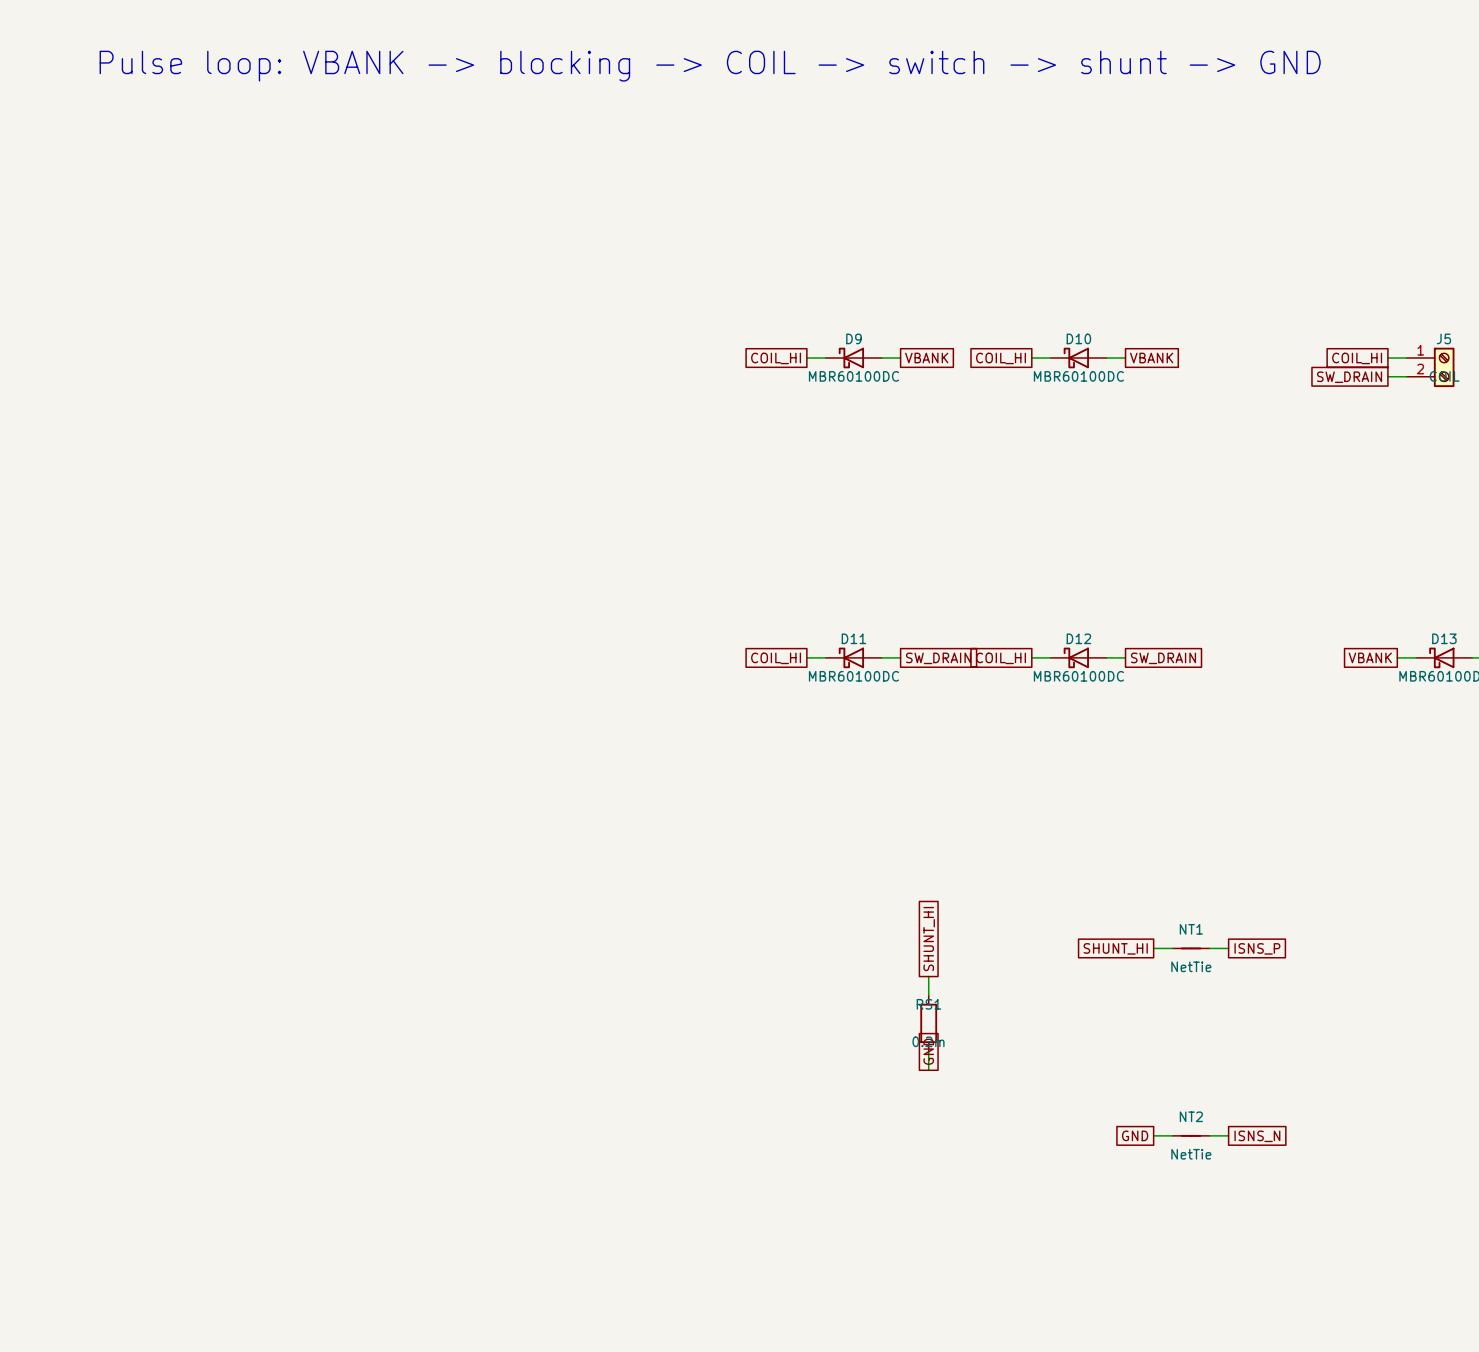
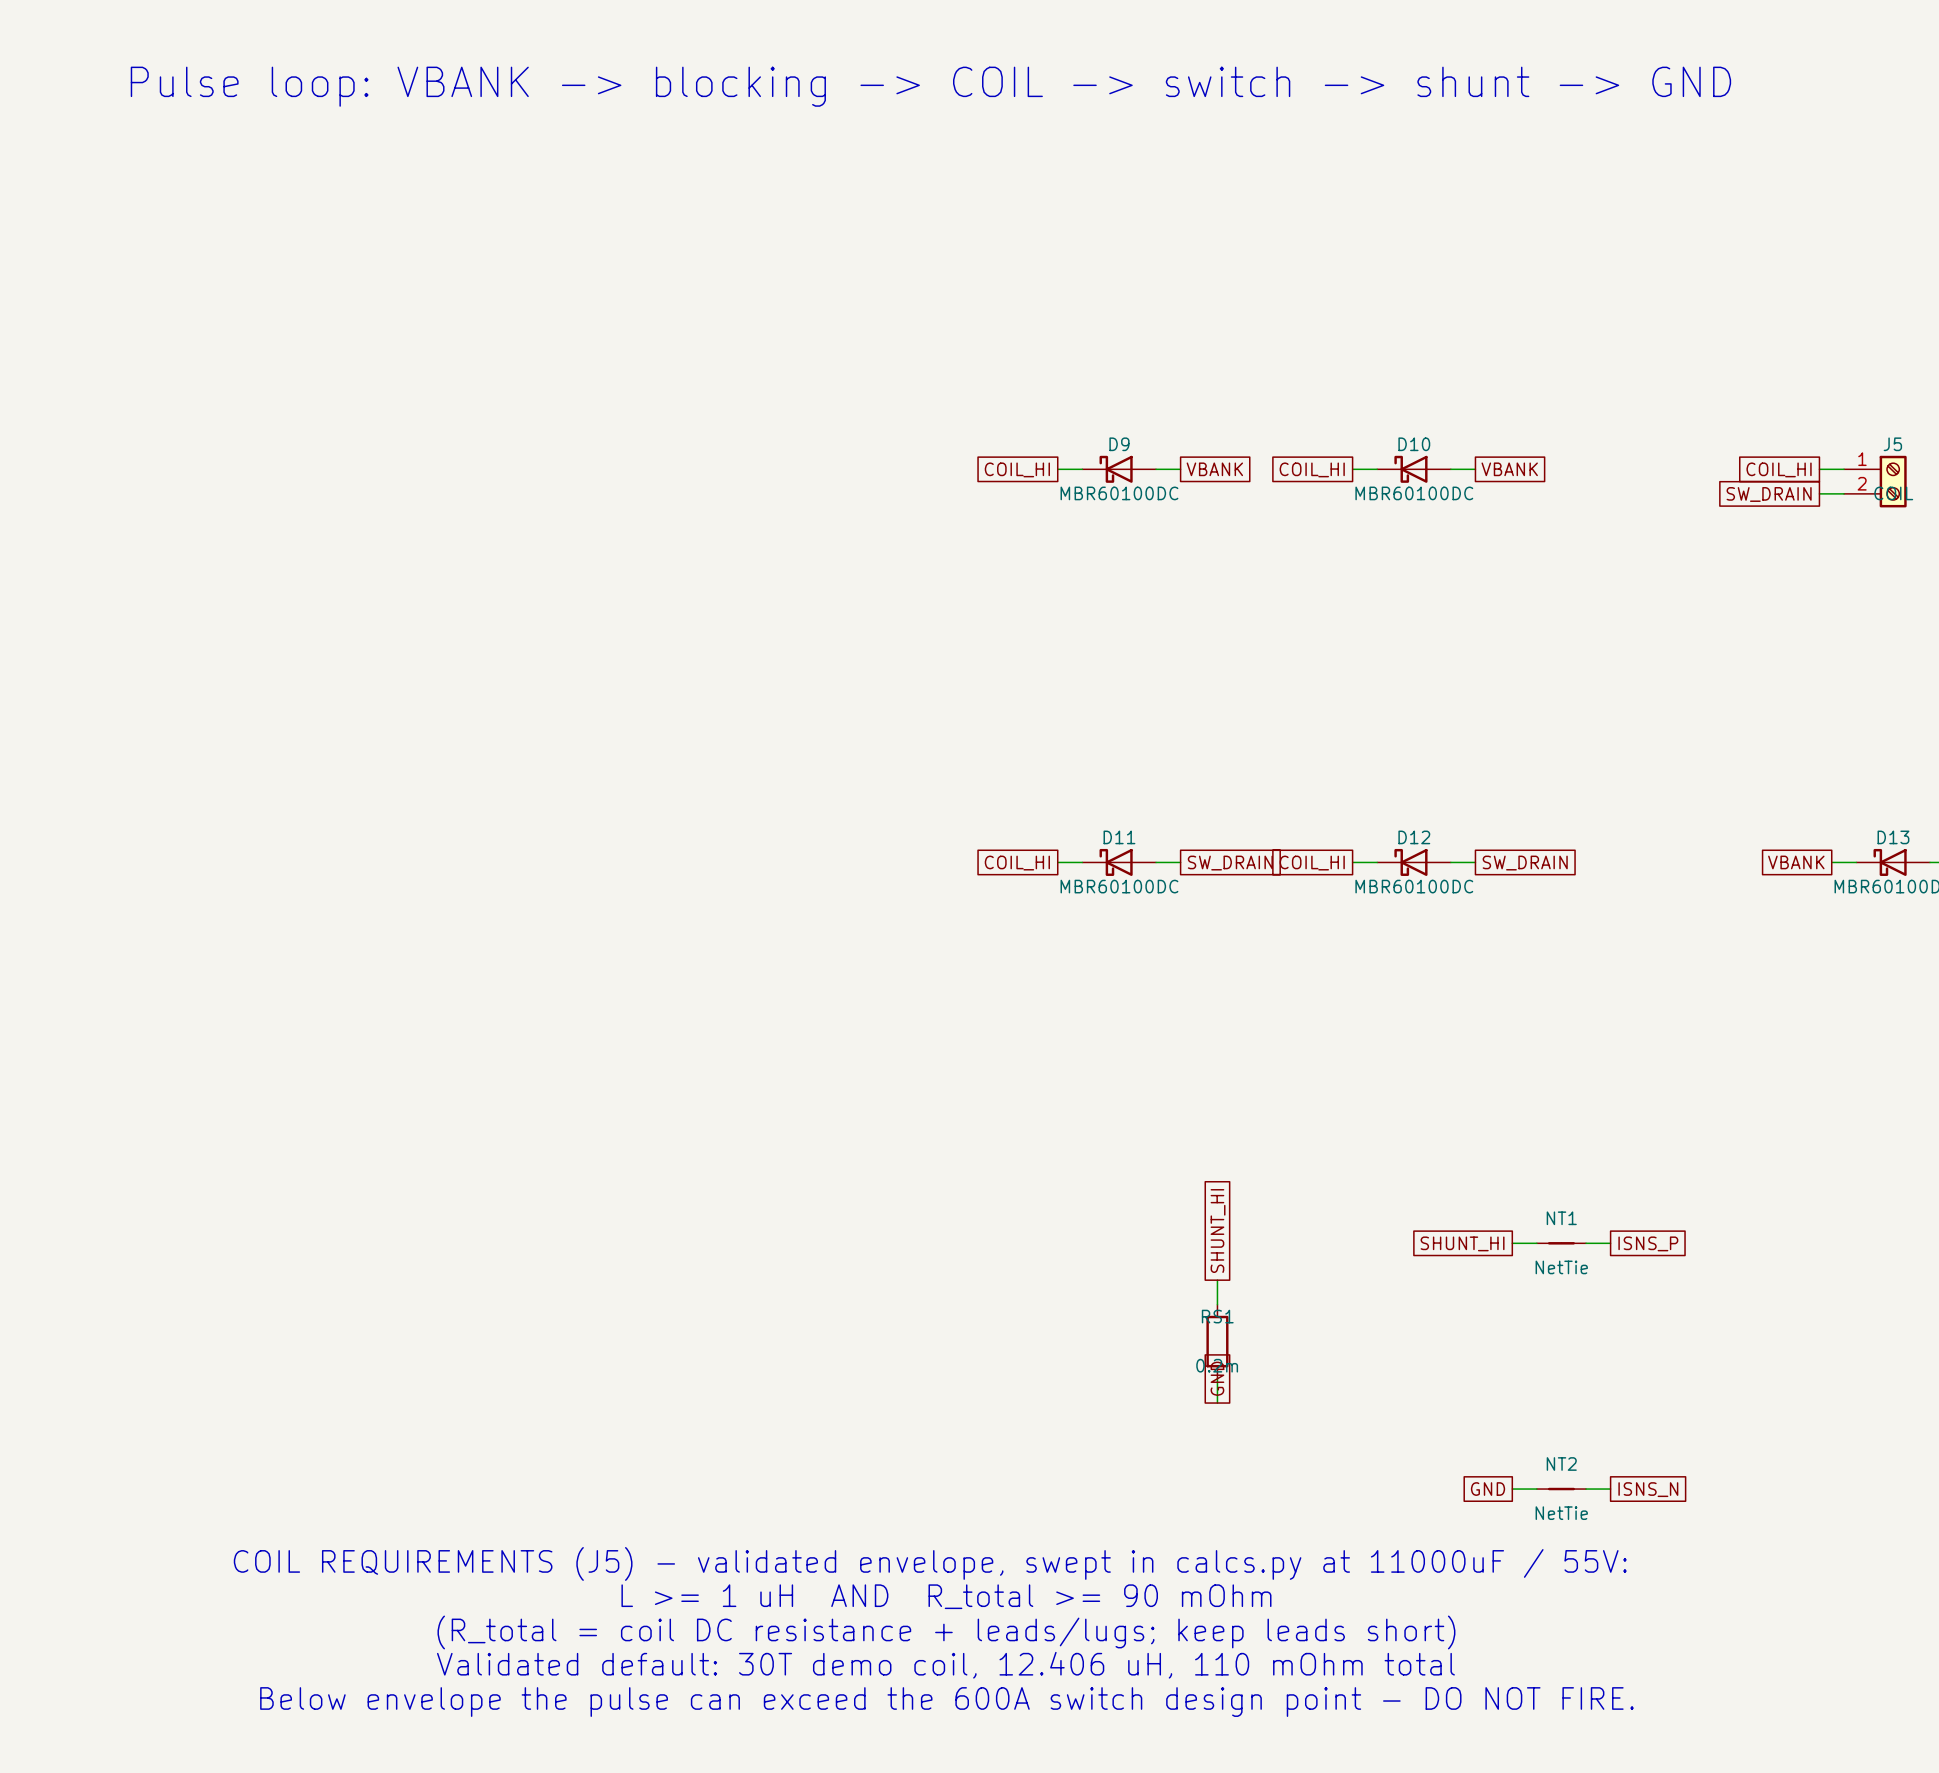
text: none -> COIL REQUIREMENTS (J5) - validated envelope, swept in calcs.py at 11000uF / 55V: (930, 1563)
text: none -> L >= 1 uH AND R_total >= 90 mOhm (946, 1596)
text: none -> (R_total = coil DC resistance + leads/lugs; keep leads short) (946, 1632)
text: none -> Validated default: 30T demo coil, 12.406 uH, 110 mOhm total (945, 1665)
text: none -> Below envelope the pulse can exceed the 600A switch design point - DO NOT FIRE. (946, 1702)

